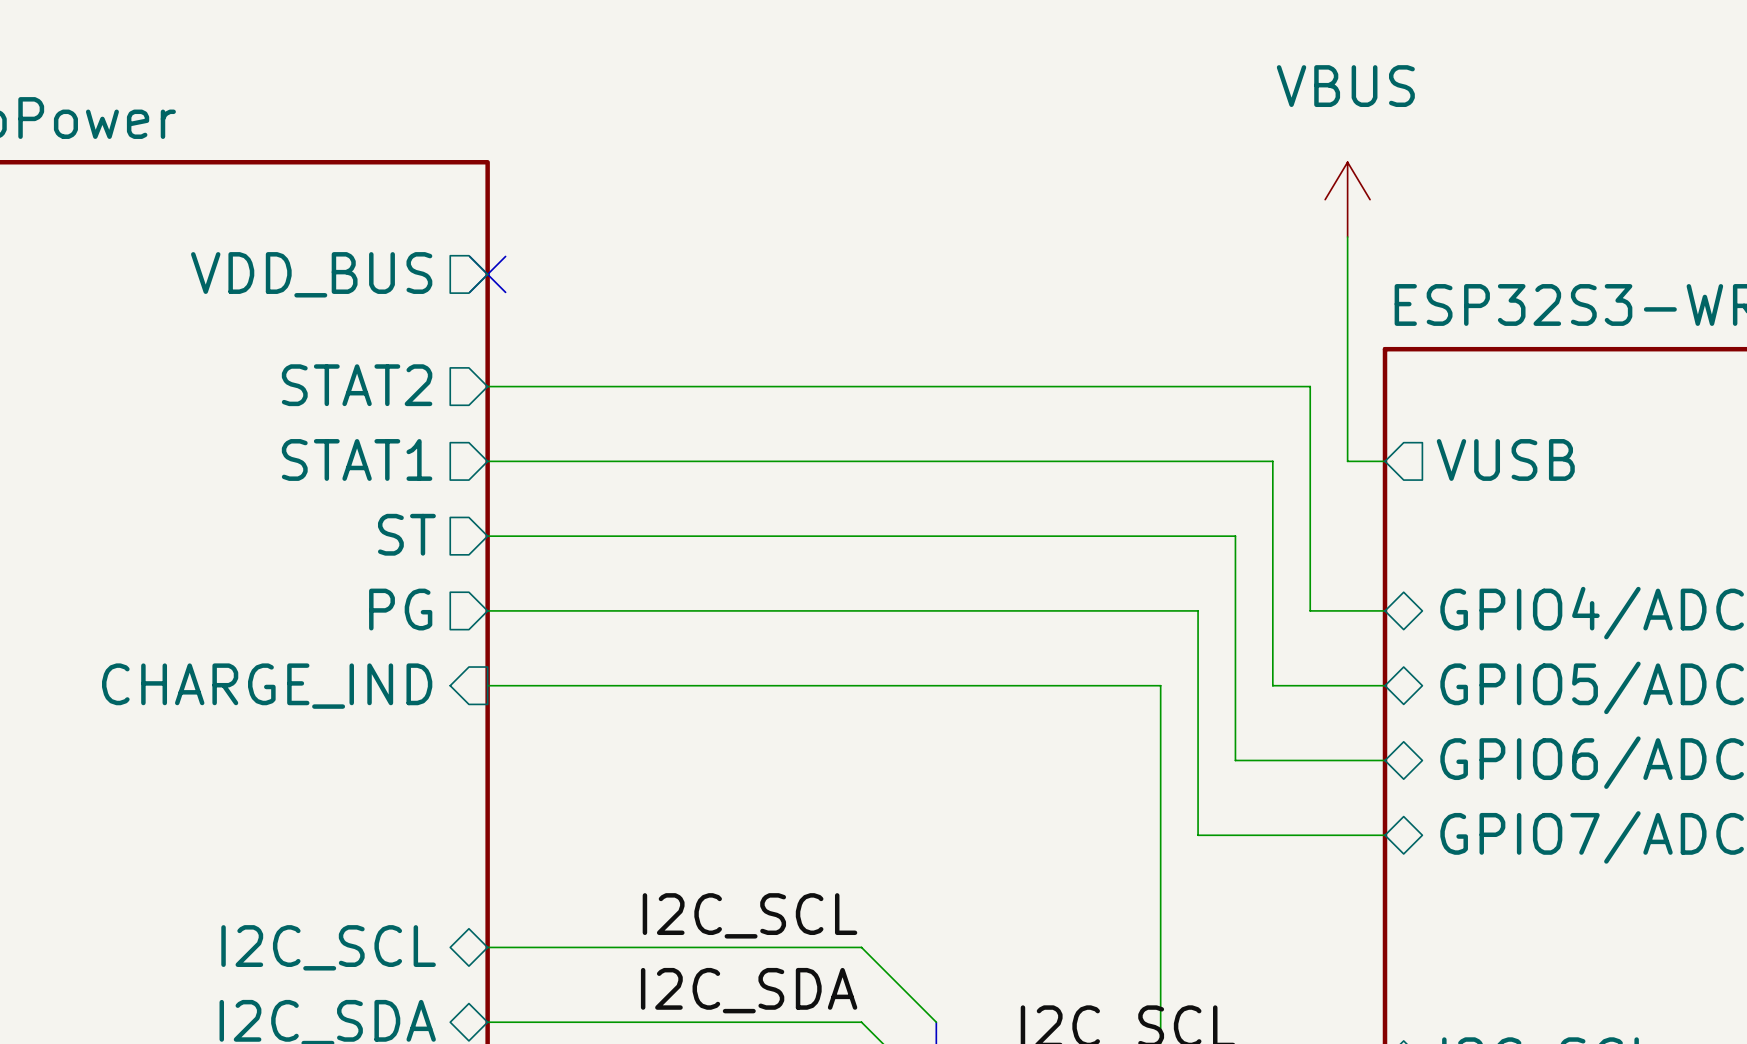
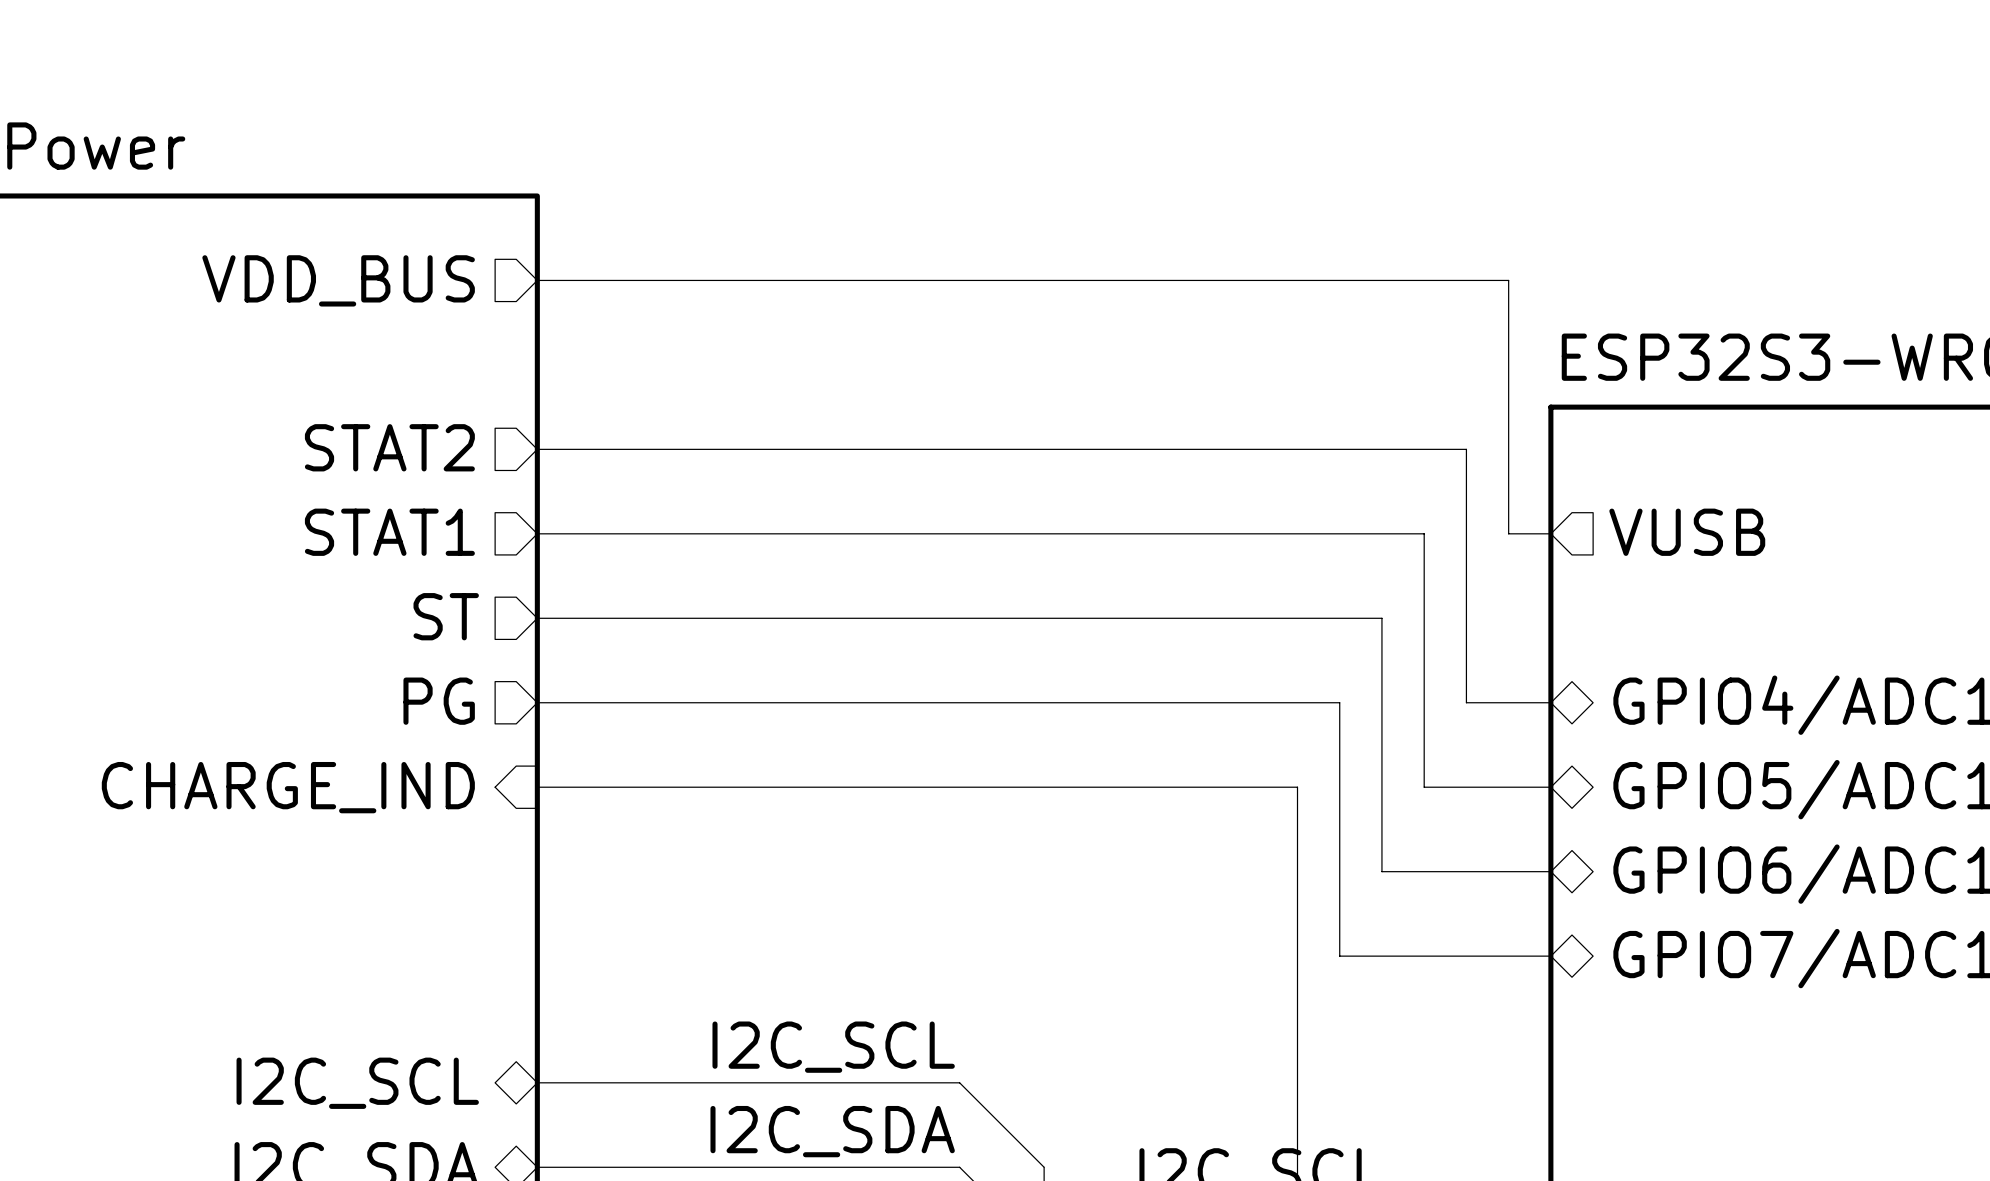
power symbol: VBUS (1347, 199) -> none
wire: none -> (537, 280) (1508, 280)
sheet pin position: VDD_BUS (311, 274) -> VDD_BUS (338, 280)
no-connect mark: (487, 274) -> none

